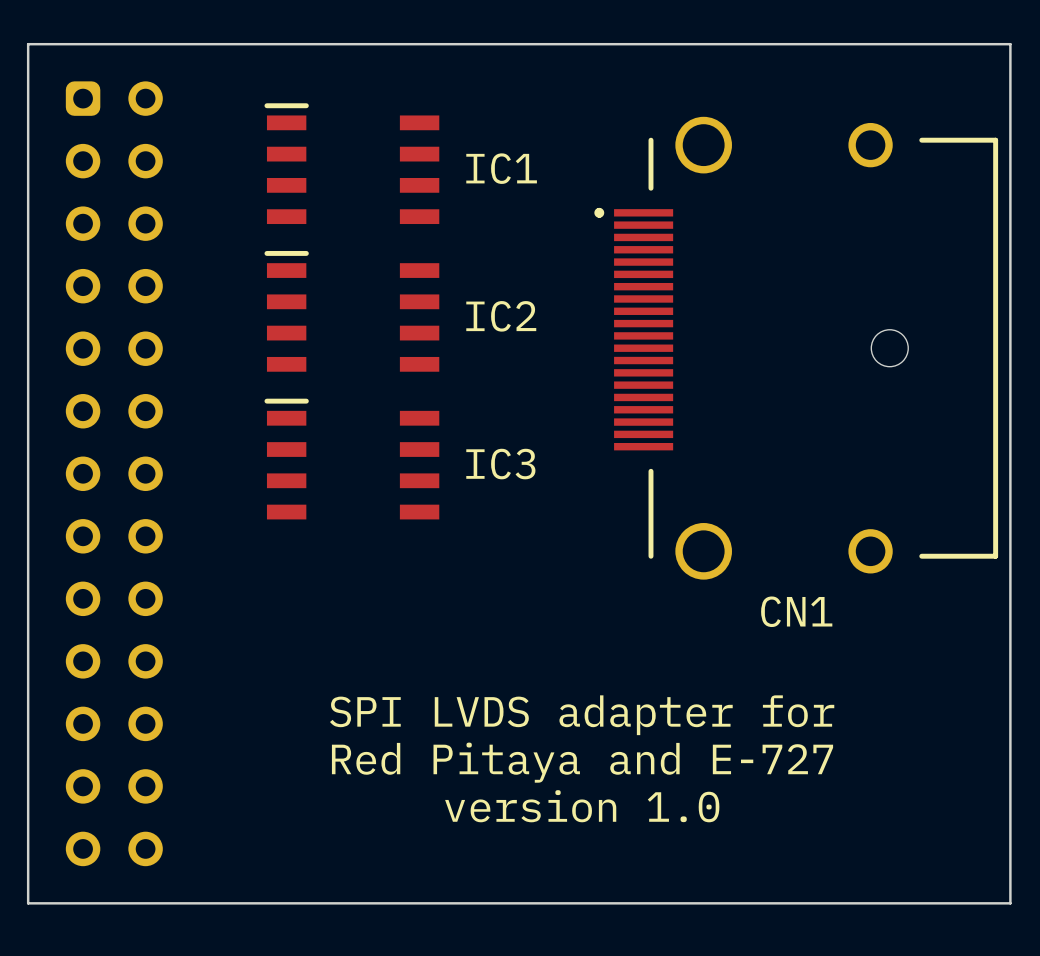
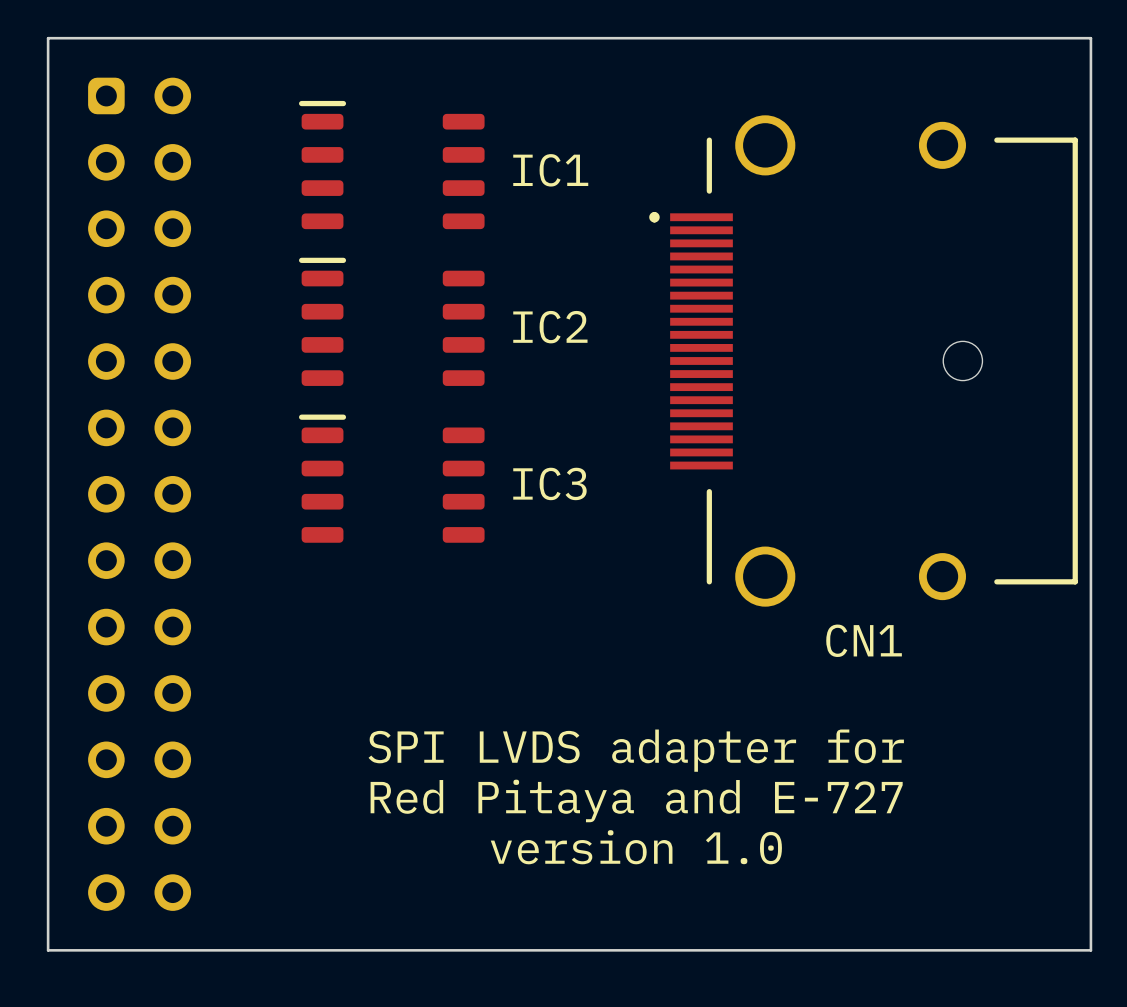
IC1 footprint: [264, 103, 440, 225] -> [299, 100, 485, 230]
IC2 footprint: [264, 250, 440, 372] -> [299, 257, 485, 386]
IC3 footprint: [264, 398, 440, 520] -> [299, 414, 485, 543]

